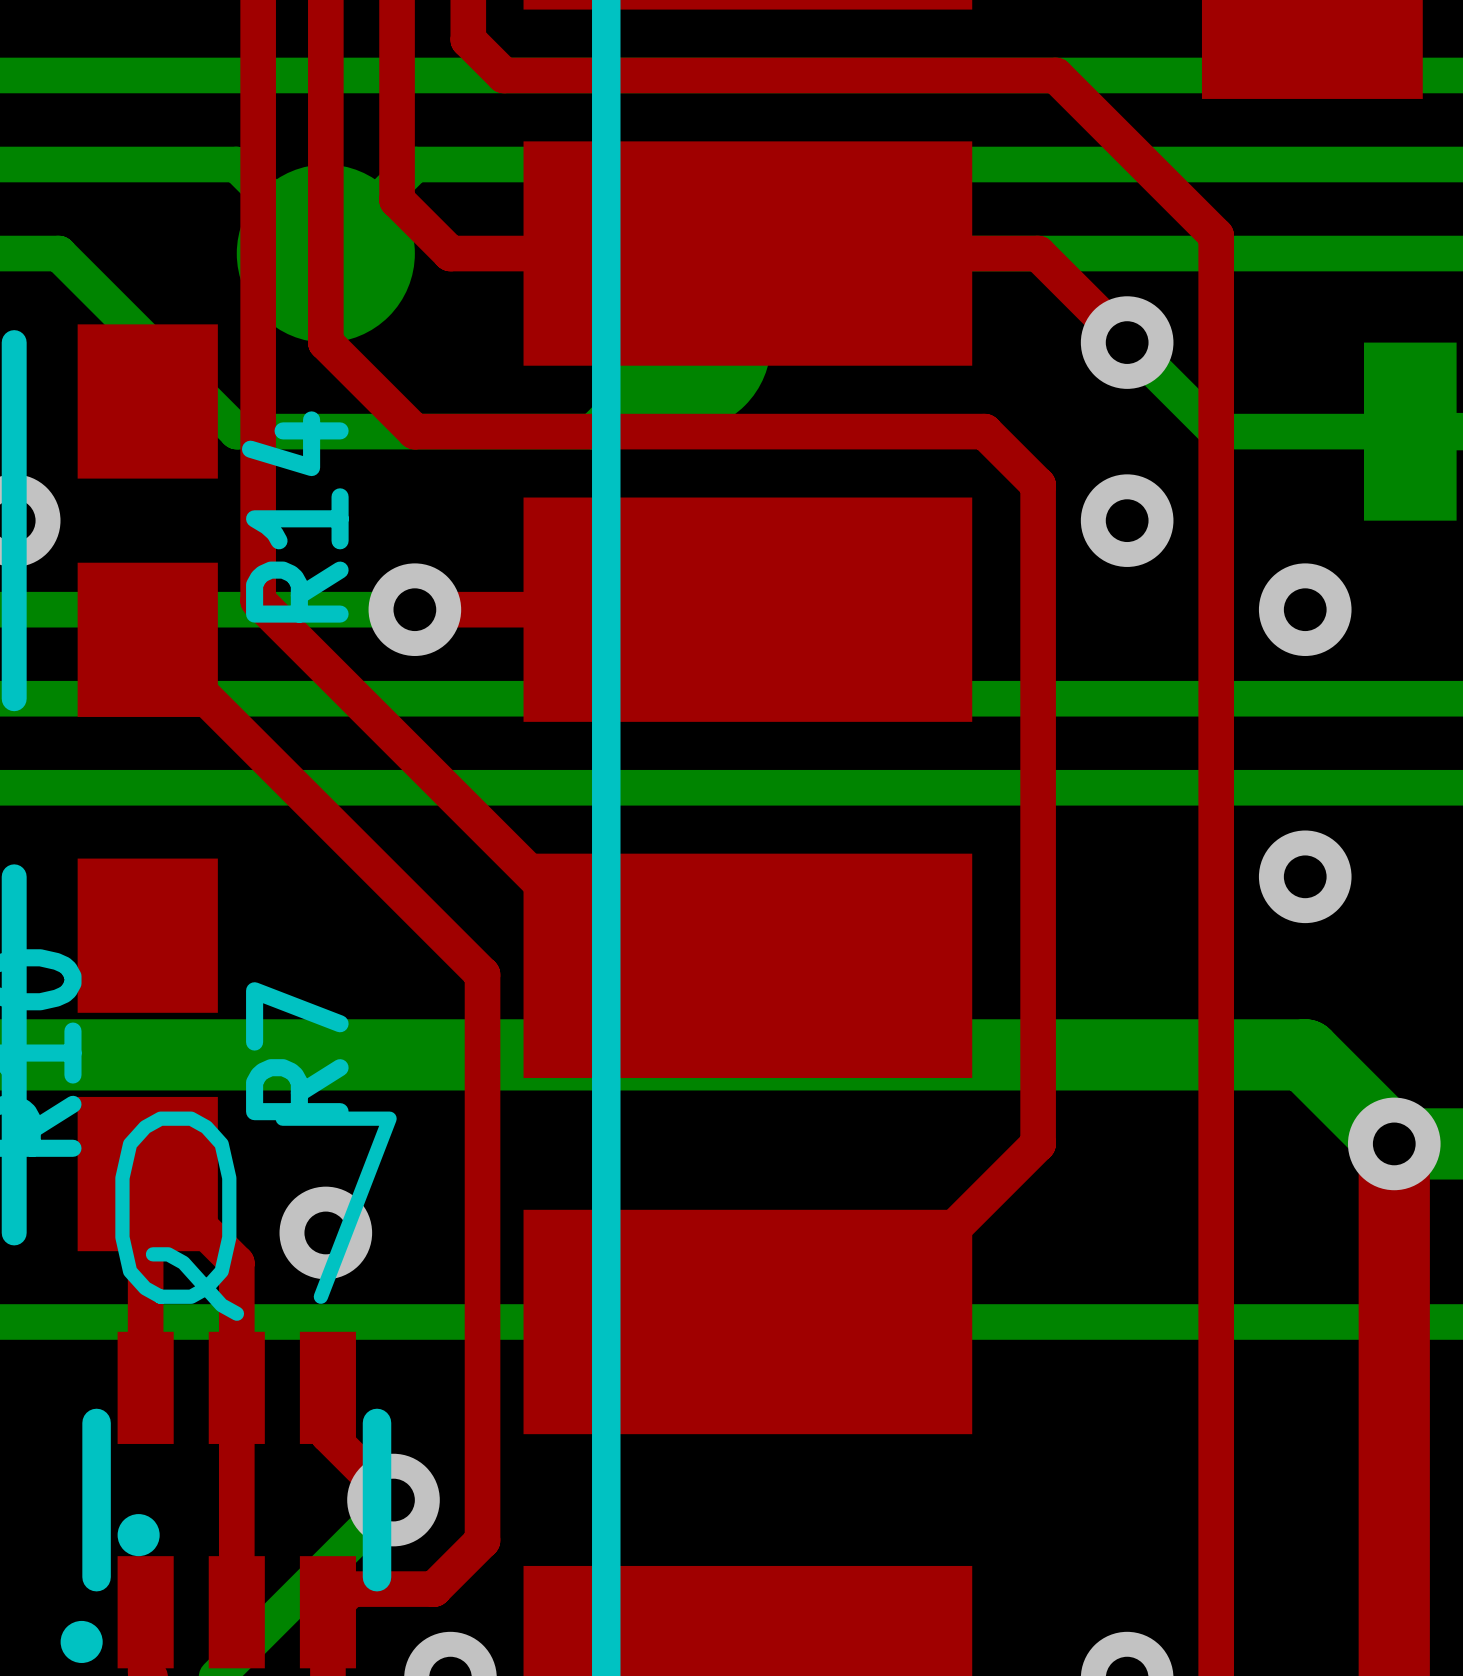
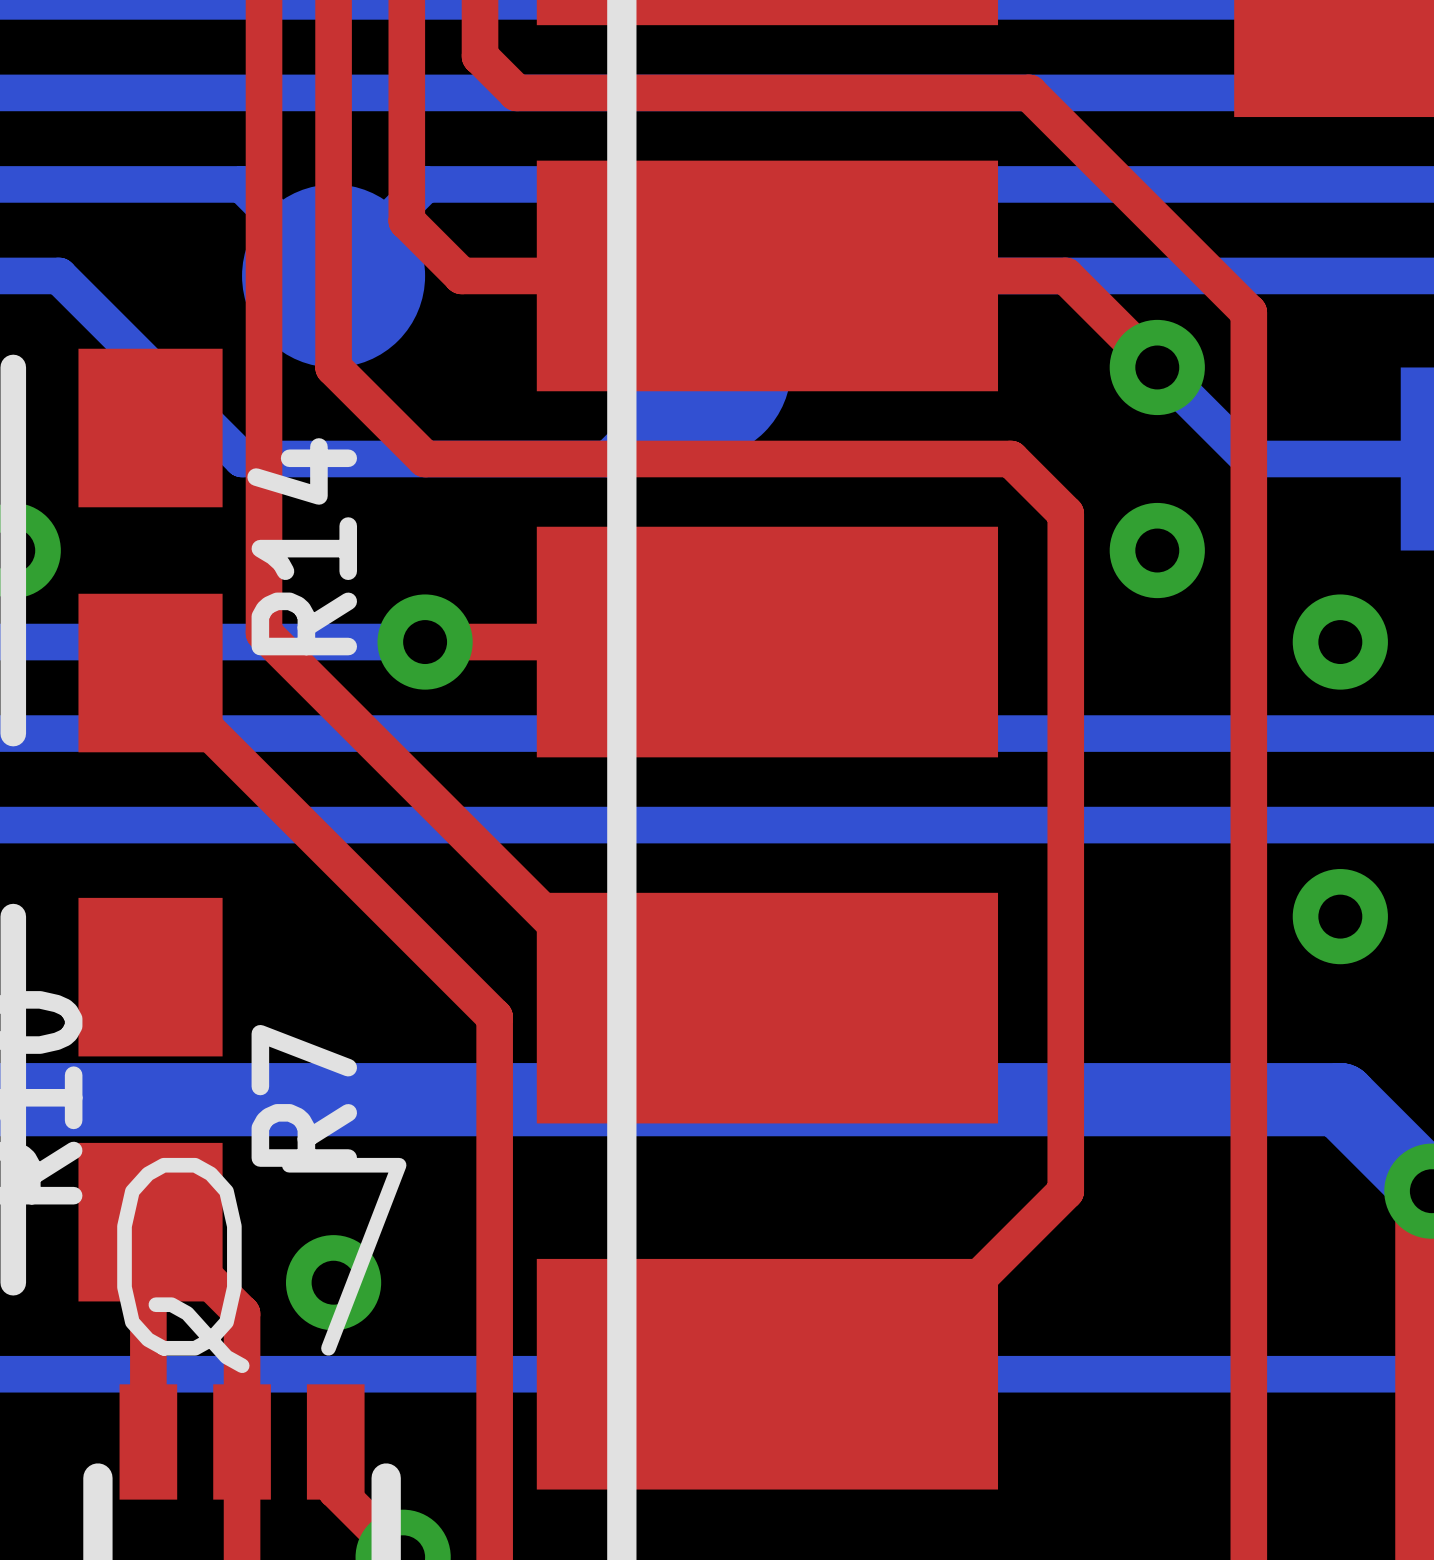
top track: (1002, 75) (1055, 75) (1216, 235) (1216, 289) -> (1029, 92) (1248, 312)

